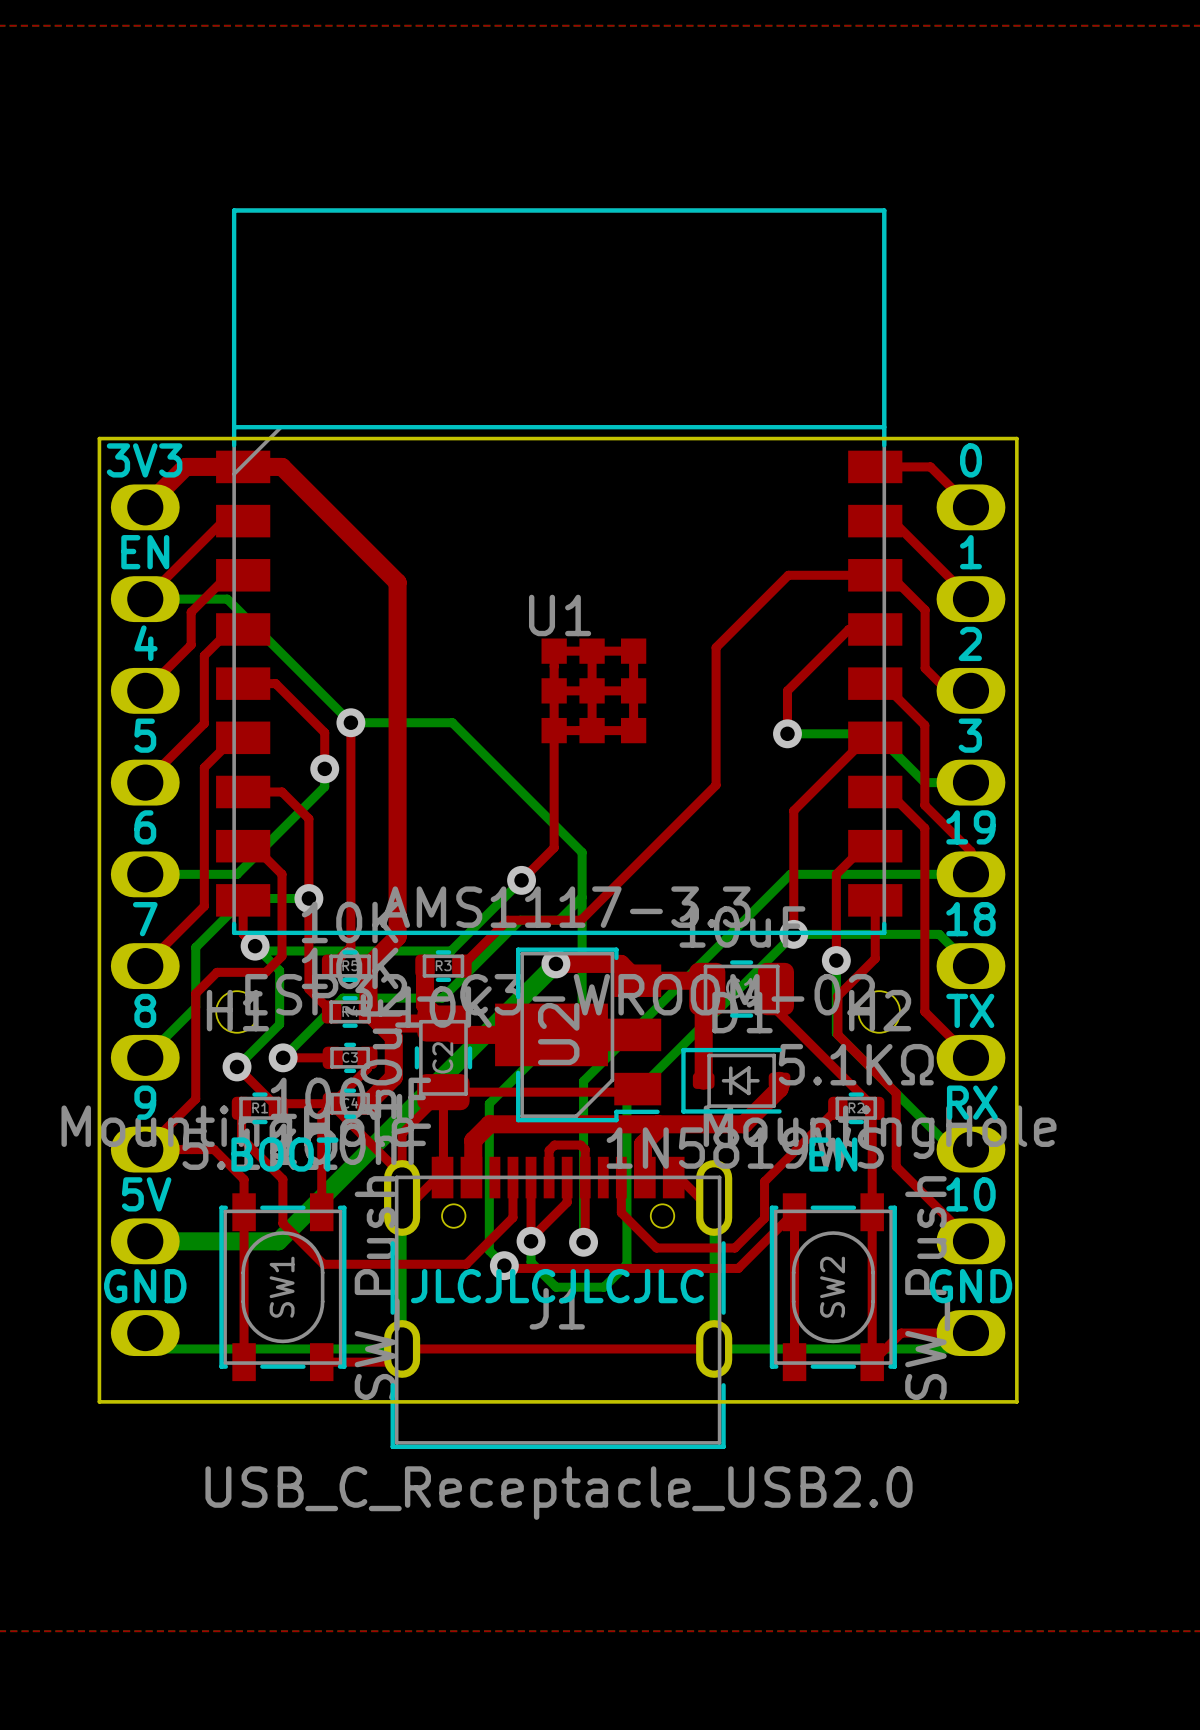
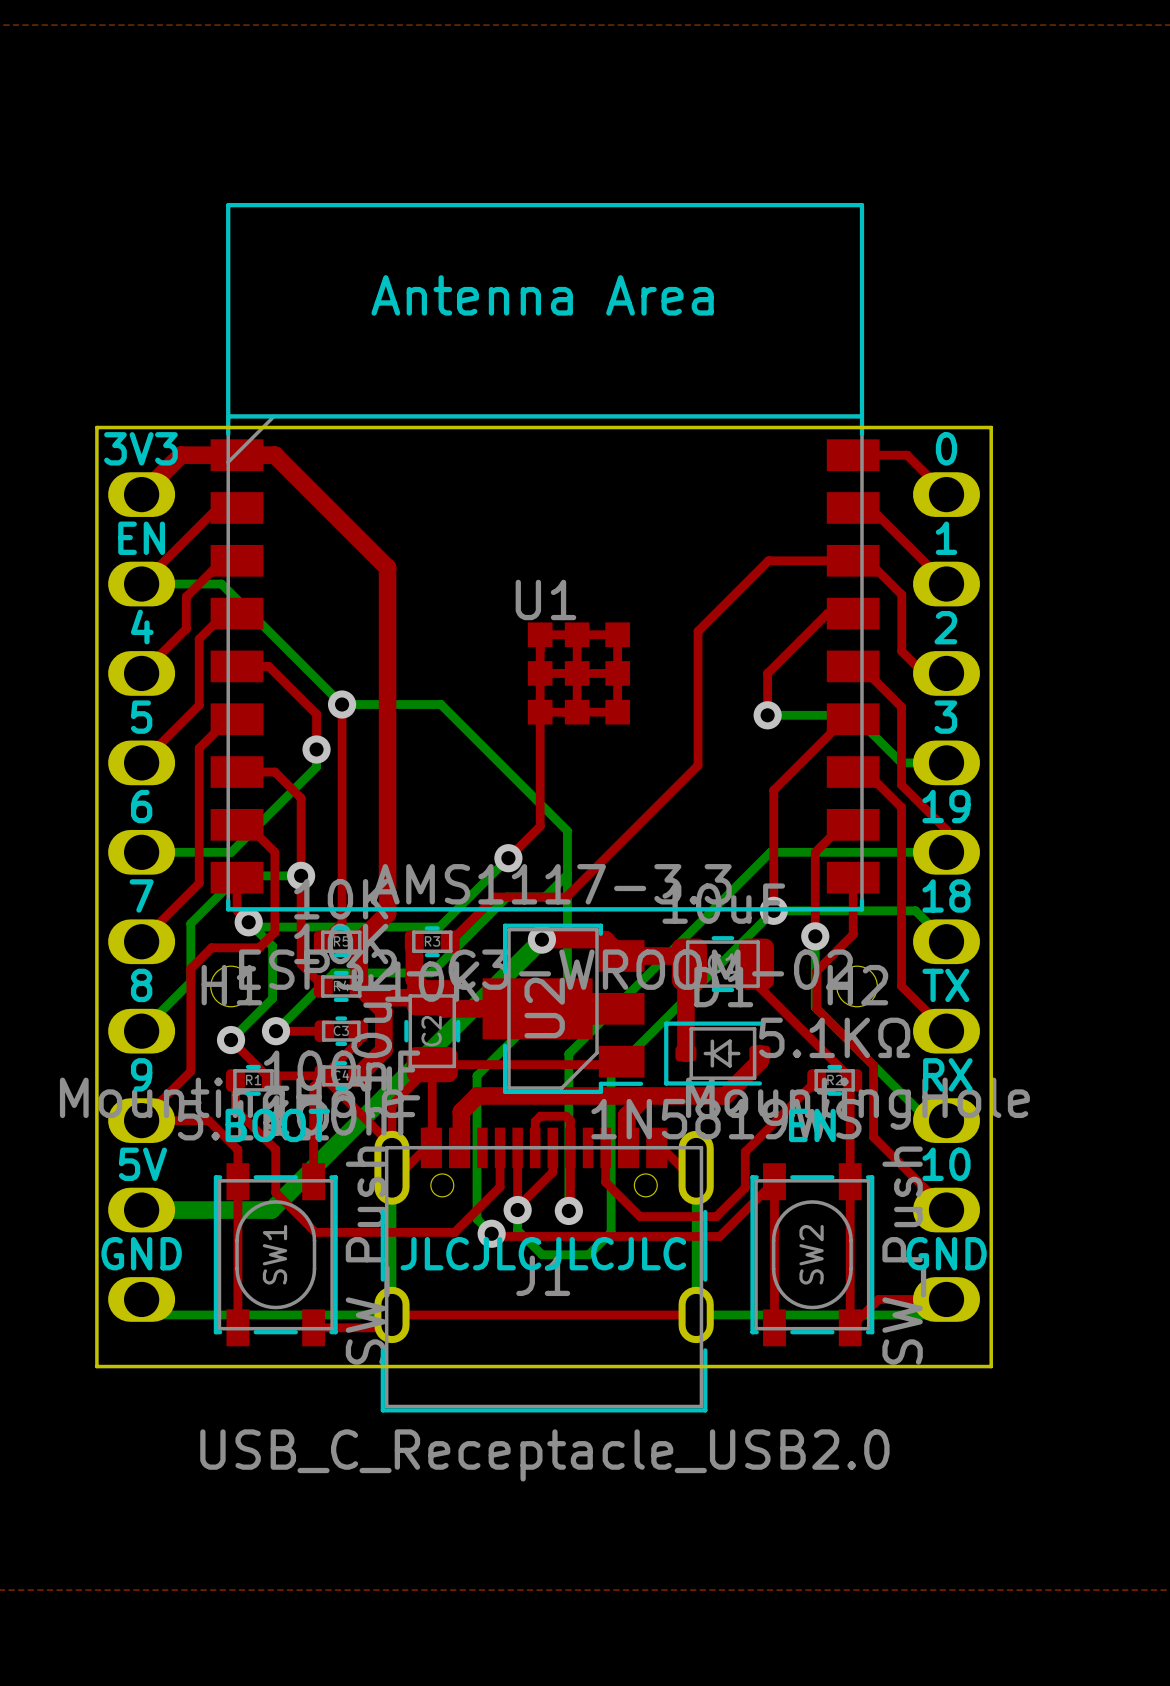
U1 text: none -> Antenna Area (542, 295)

